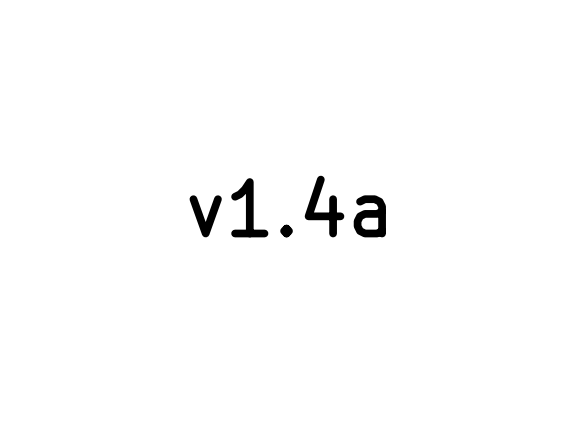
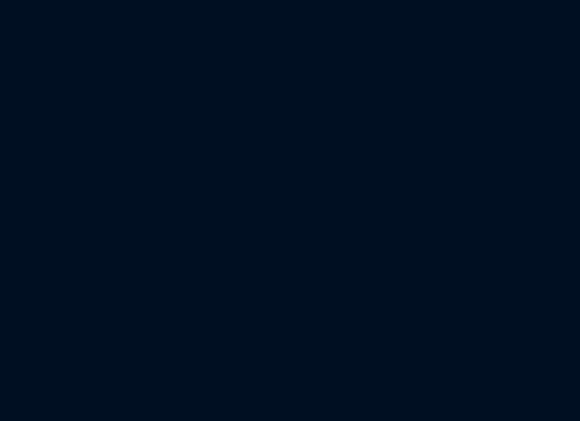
text: v1.4a (287, 206) -> none

